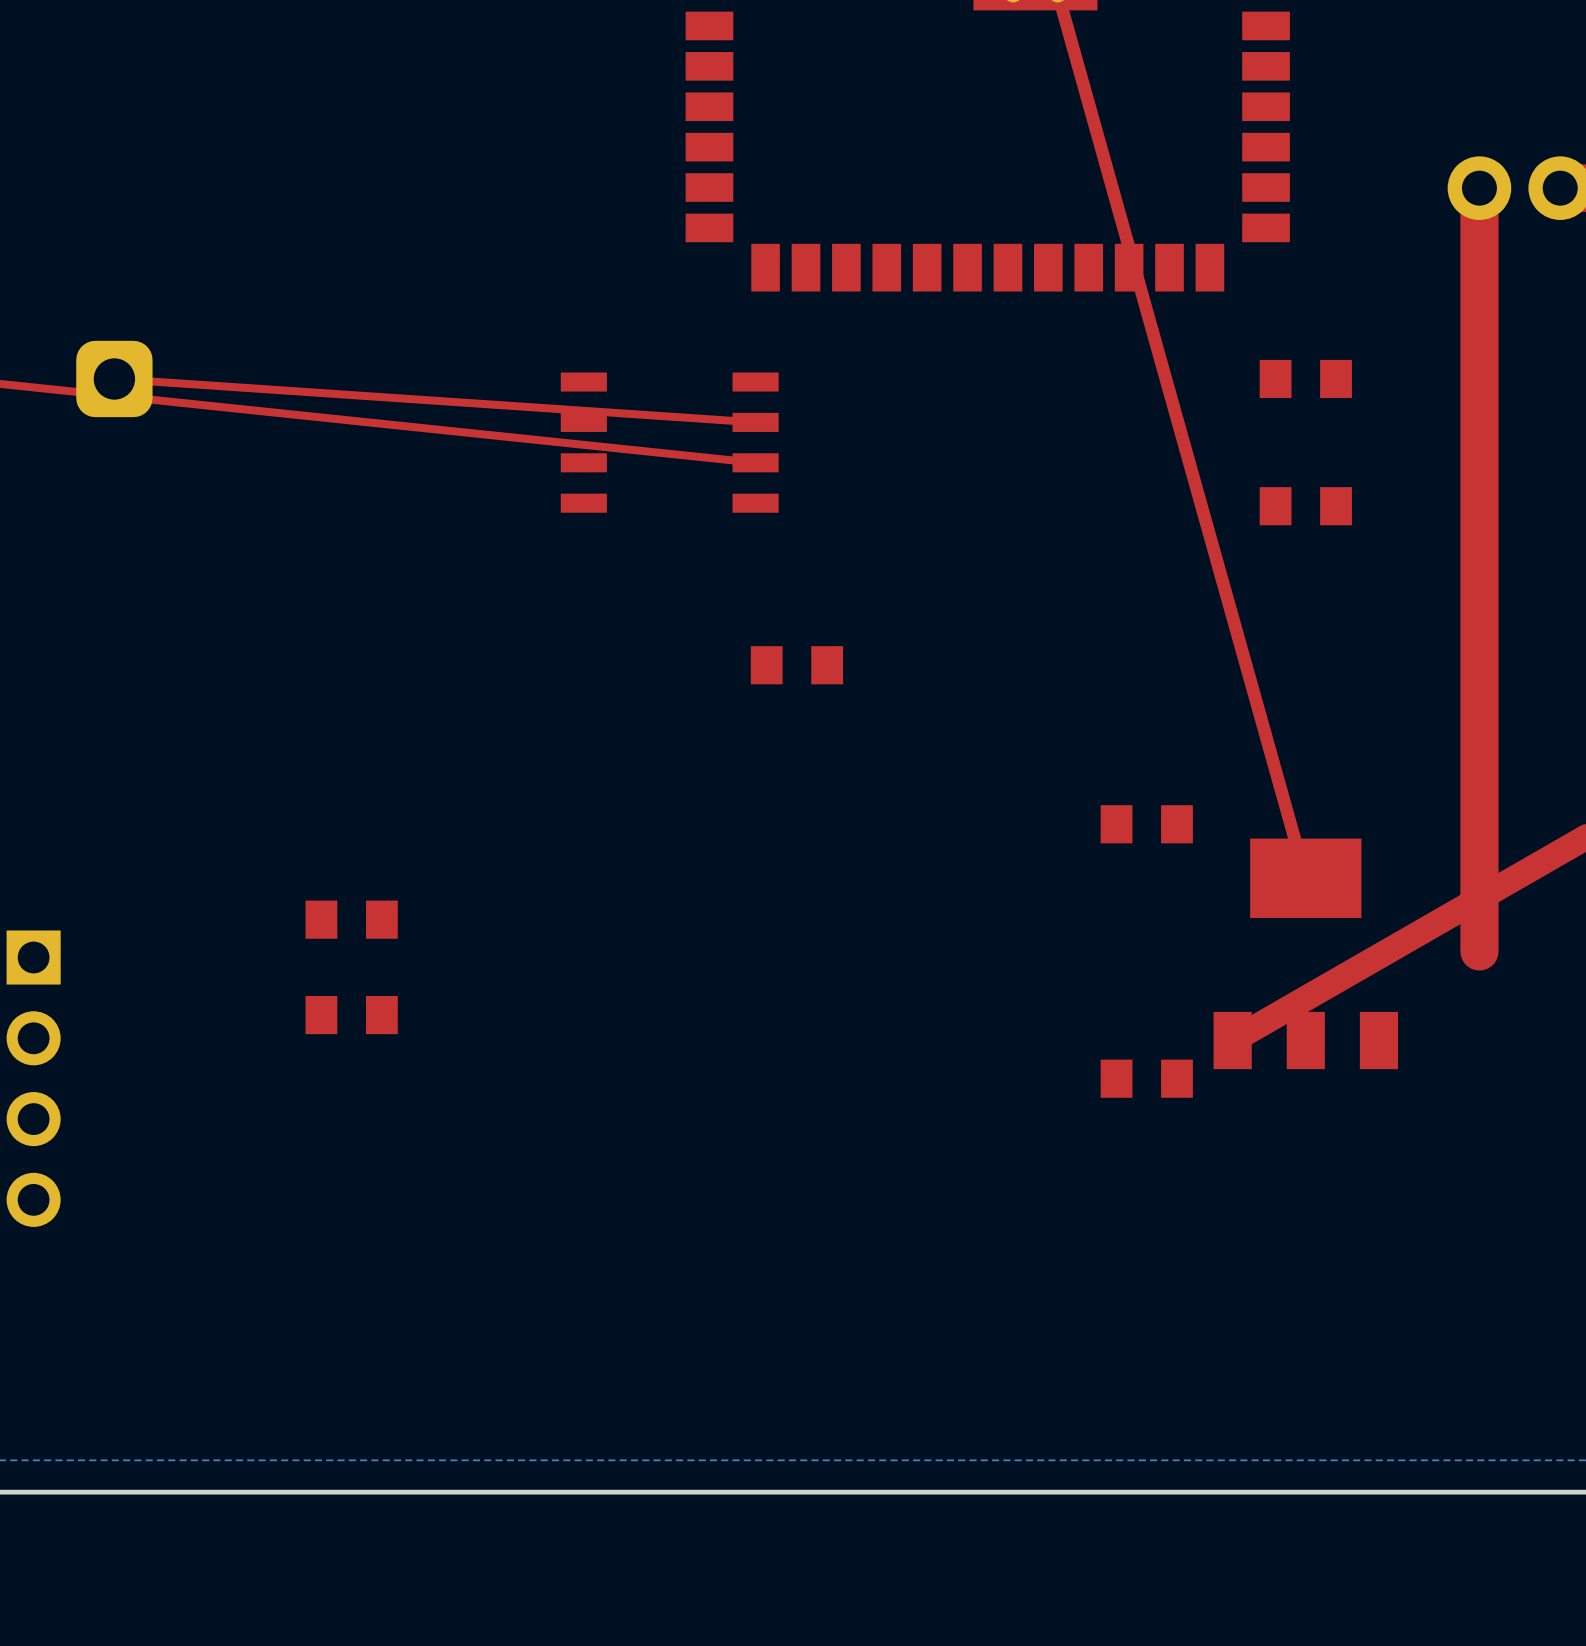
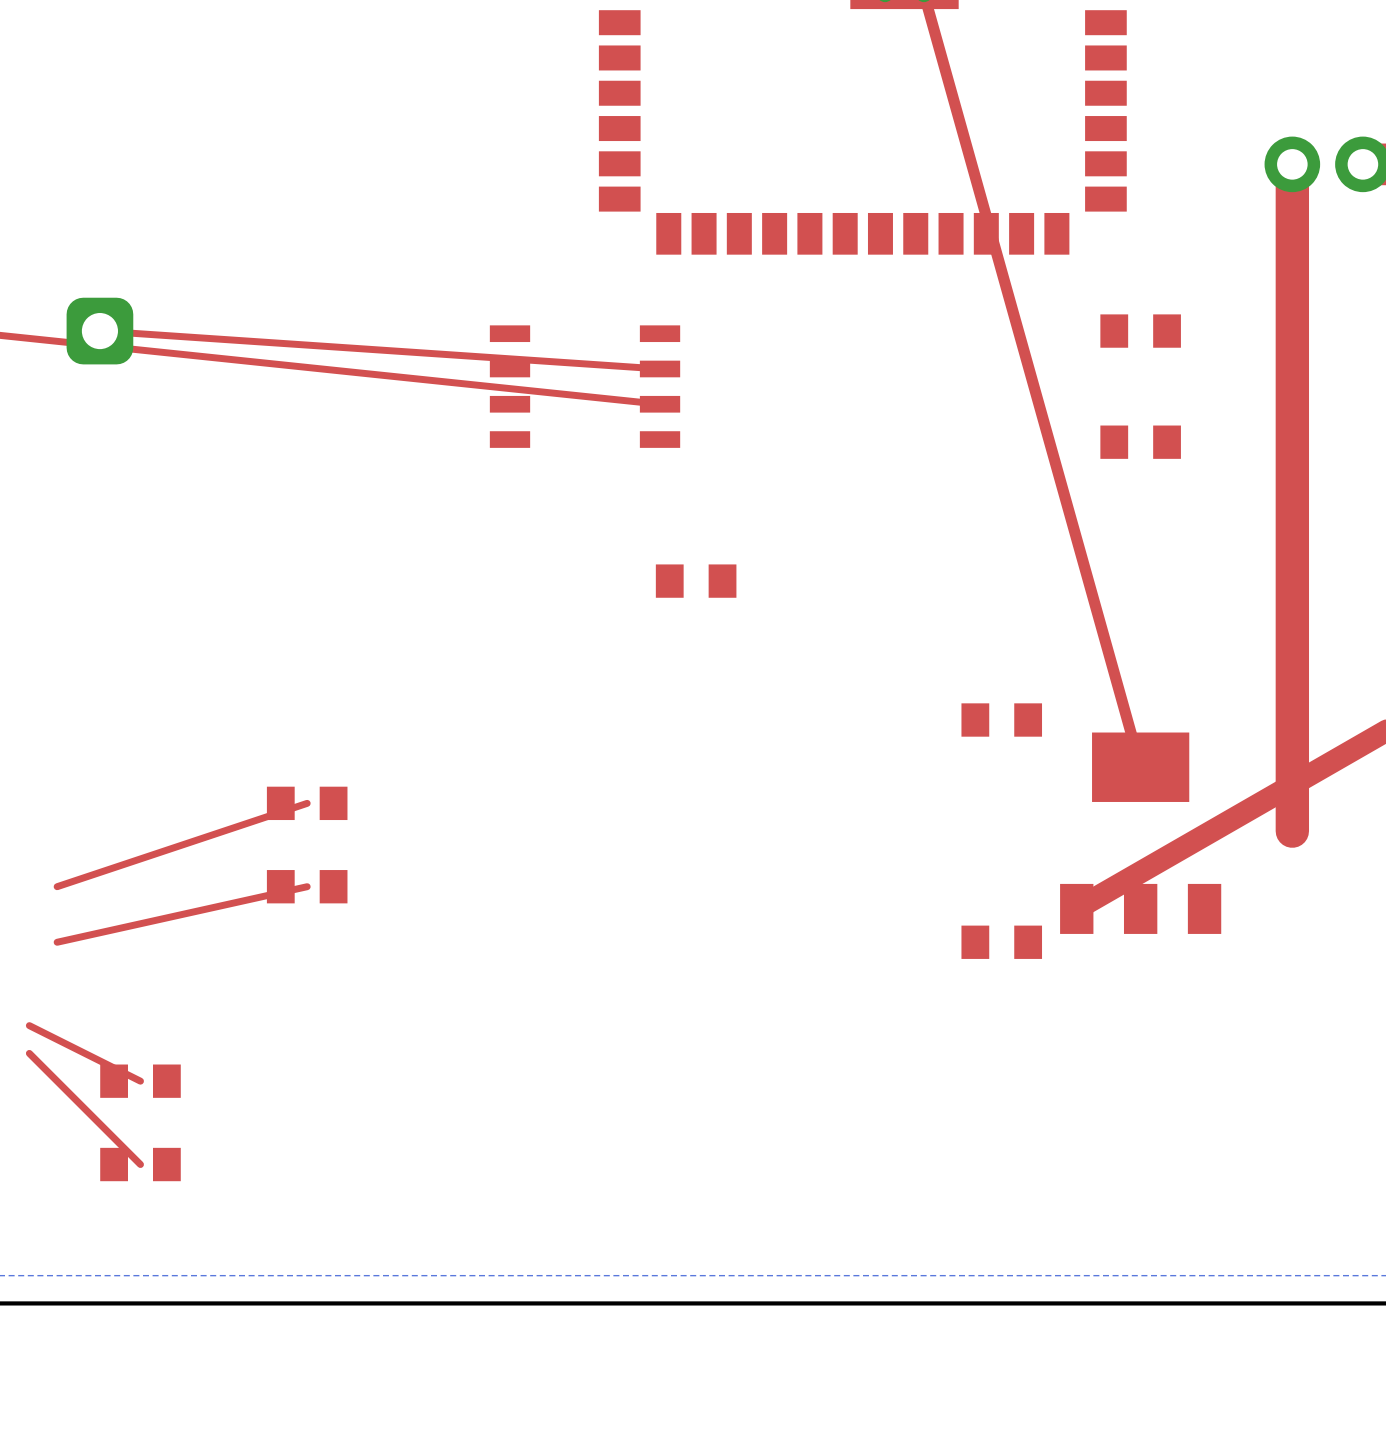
top track: none -> (307, 803) (57, 886)
top track: none -> (307, 886) (57, 942)
part: (33, 1078) -> none
top track: none -> (29, 1025) (140, 1081)
top track: none -> (29, 1053) (140, 1164)
part: none -> (140, 1081)
part: none -> (140, 1164)

